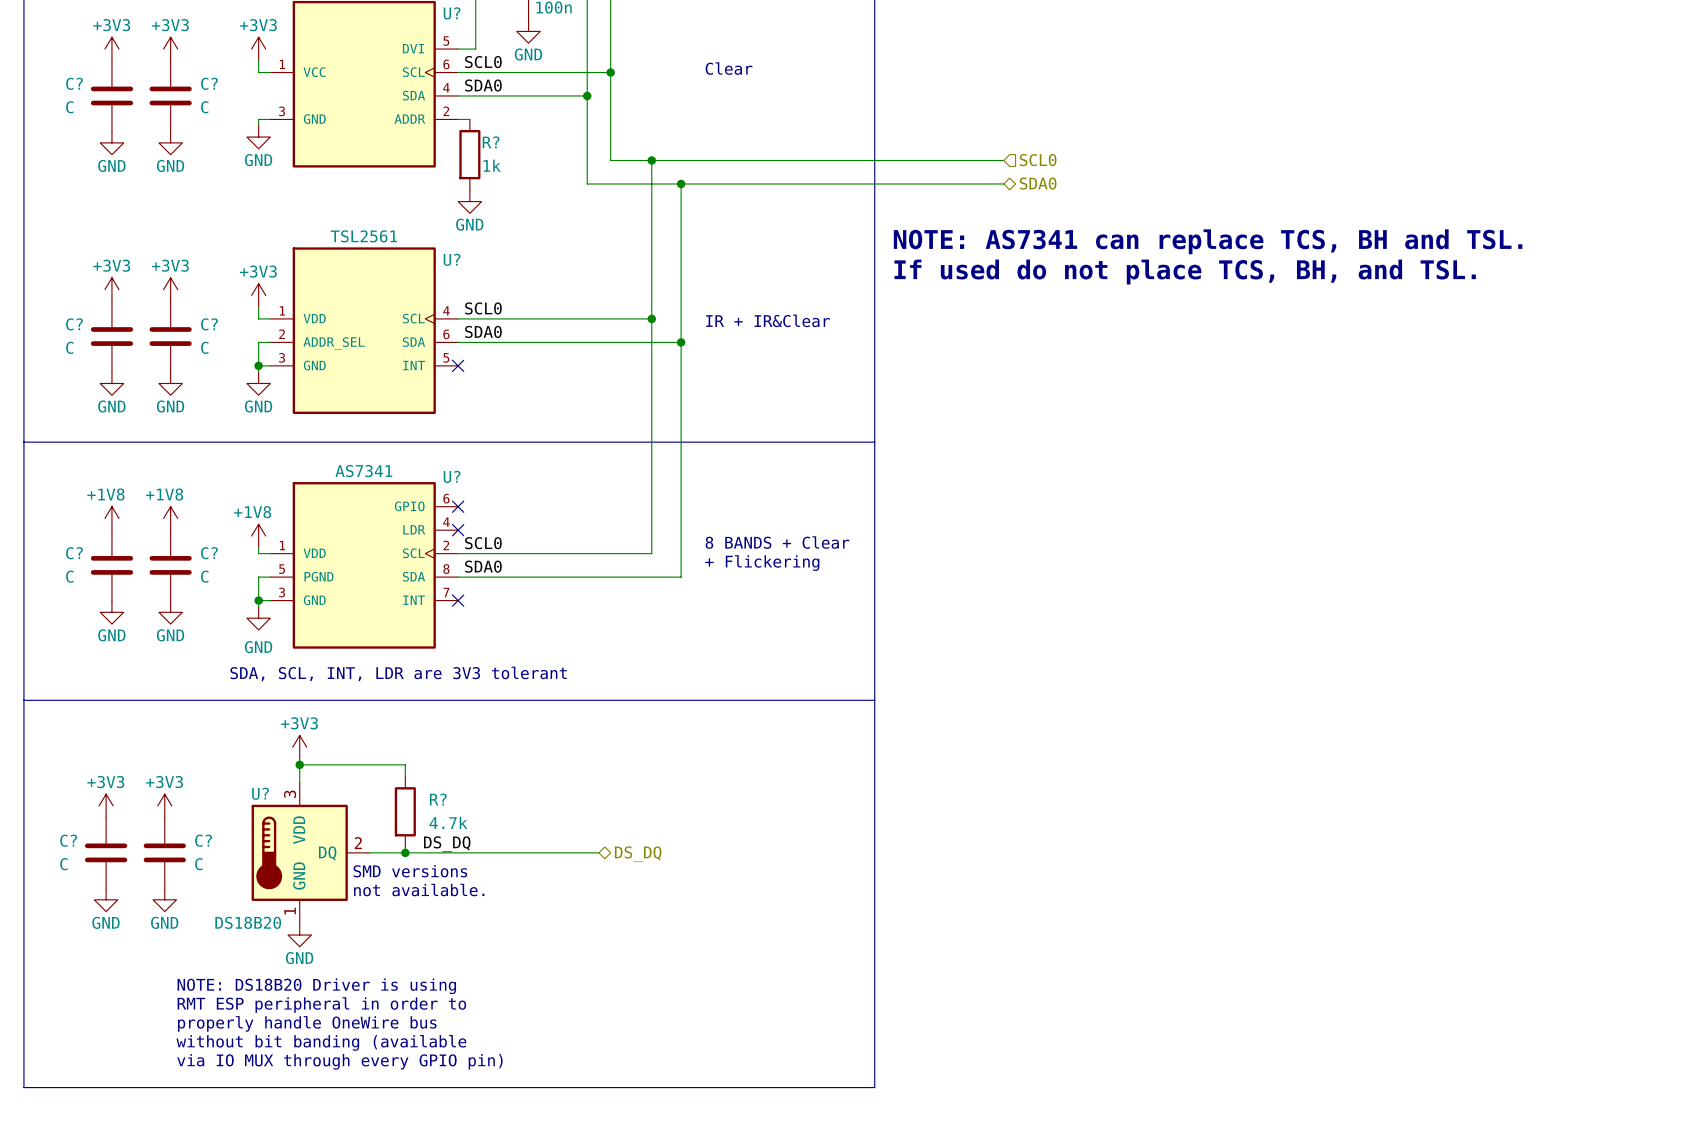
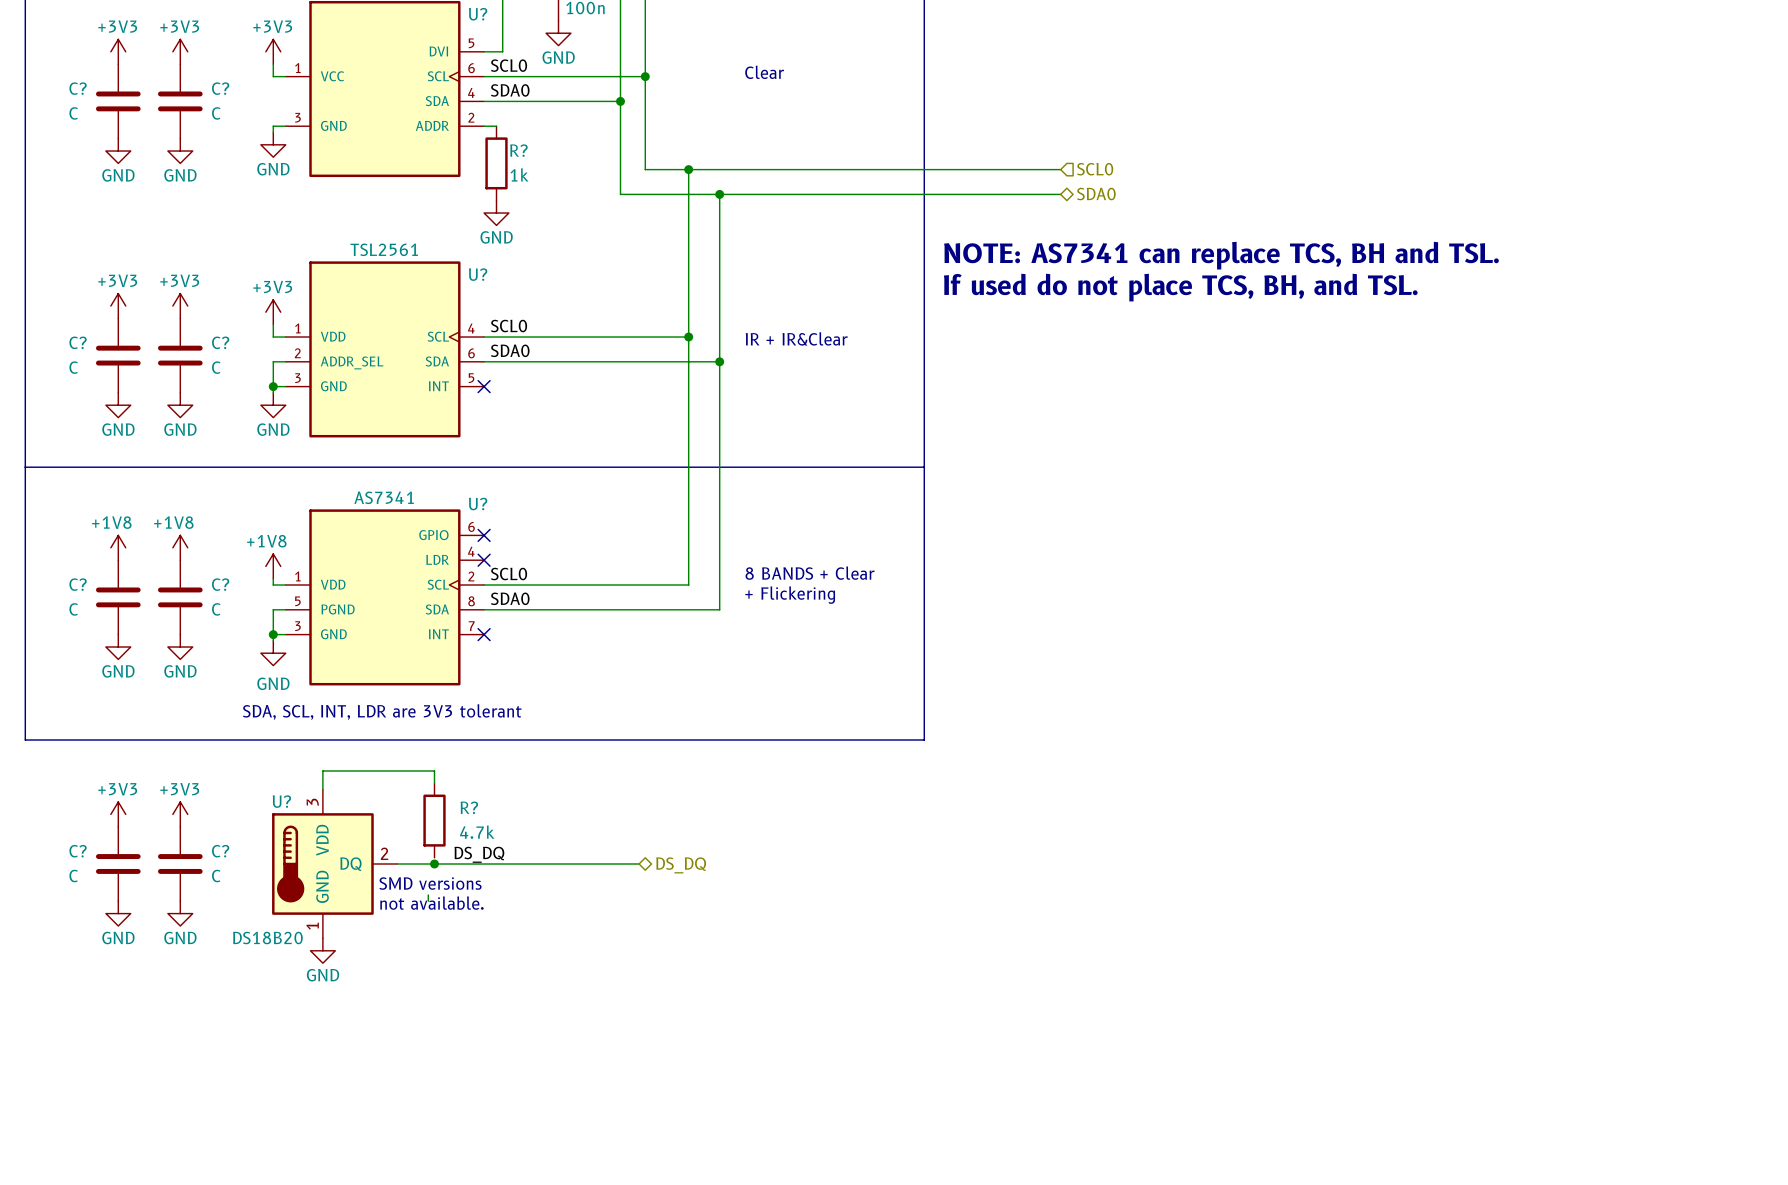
line: (23, 700) (23, 1087) (874, 1087) (874, 700) -> none
wire: none -> (434, 783) (434, 771) (322, 771) (322, 789)
power symbol: +3V3 (299, 747) -> none
wire: (299, 764) (405, 764) (405, 776) -> none
junction: (299, 764) -> none
power symbol: none -> +3V3 (118, 814)
power symbol: none -> +3V3 (180, 814)
power symbol: +3V3 (106, 805) -> none
power symbol: +3V3 (164, 805) -> none
R? position: (405, 811) -> (434, 820)
C?: none -> C (118, 863)
C?: none -> C (180, 863)
label position: DS_DQ (447, 844) -> DS_DQ (479, 854)
C?: C (106, 852) -> none
C?: C (164, 852) -> none
U? position: (310, 852) -> (334, 863)
wire: (370, 852) (598, 852) -> (397, 863) (639, 863)
junction position: (405, 852) -> (434, 863)
hierarchical label position: DS_DQ (638, 854) -> DS_DQ (681, 865)
power symbol: none -> GND (118, 913)
power symbol: none -> GND (180, 913)
text position: SMD versions (410, 871) -> SMD versions (430, 883)
text position: not available. (419, 890) -> not available. (431, 903)
power symbol: GND (106, 899) -> none
power symbol: GND (164, 899) -> none
power symbol position: GND (299, 935) -> GND (322, 950)
text: NOTE: DS18B20 Driver is using (316, 986) -> none
text: RMT ESP peripheral in order to (321, 1005) -> none
text: properly handle OneWire bus (307, 1023) -> none
text: without bit banding (available (321, 1042) -> none
text: via IO MUX through every GPIO pin) (339, 1061) -> none

